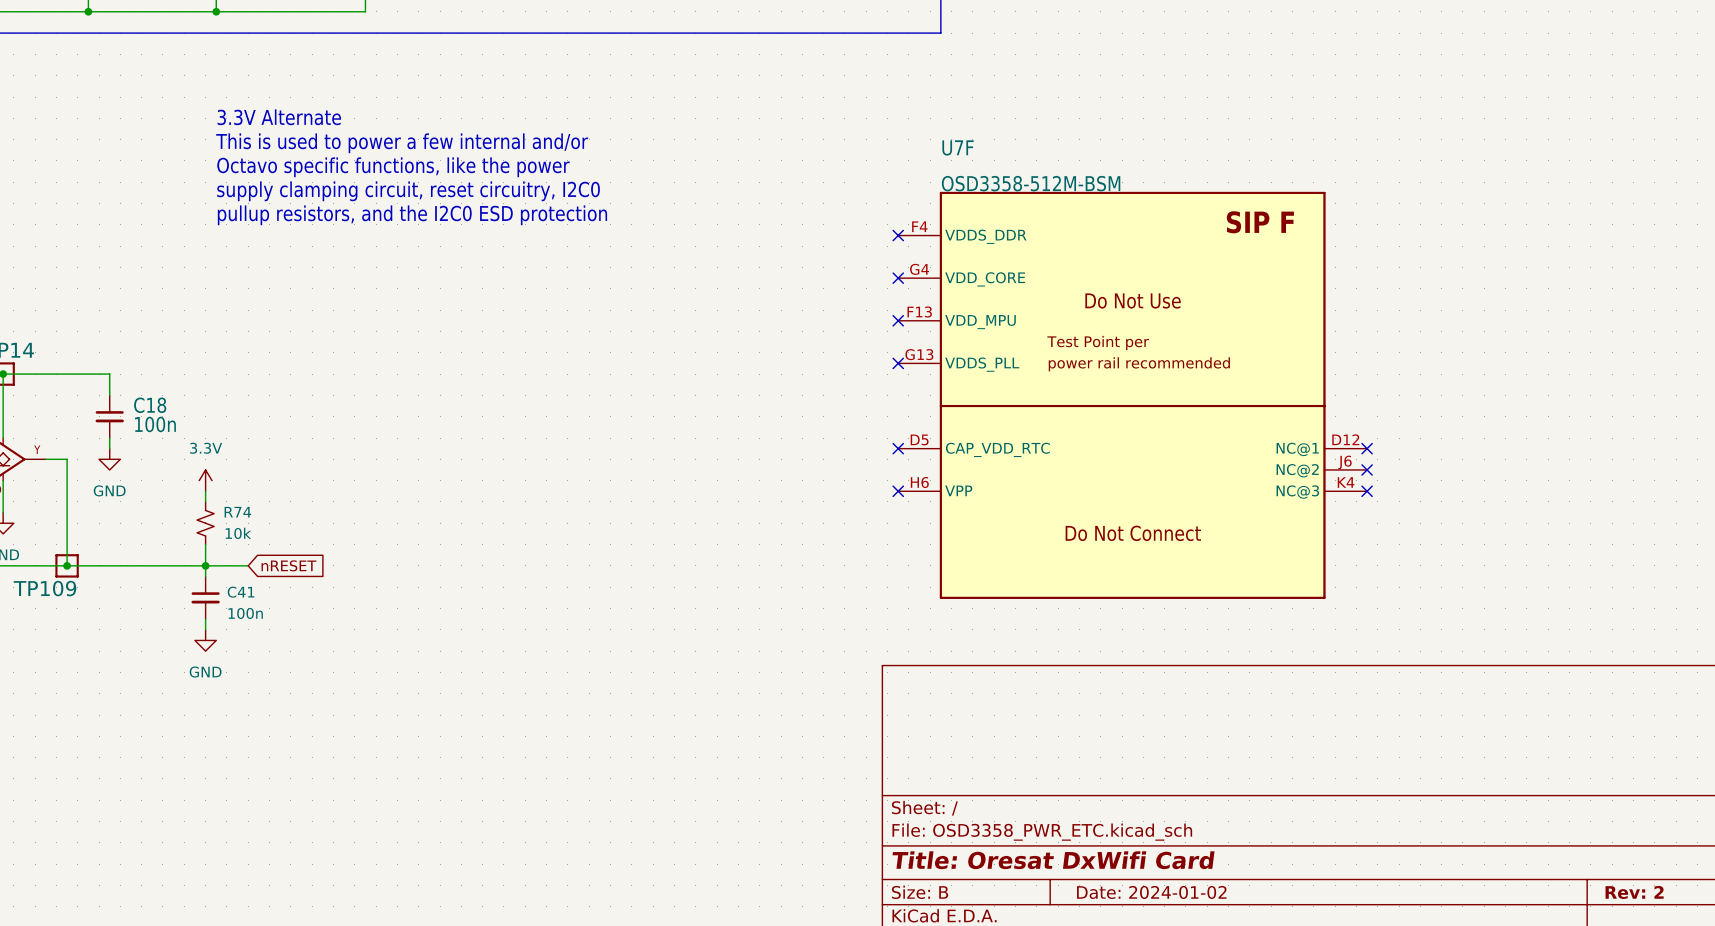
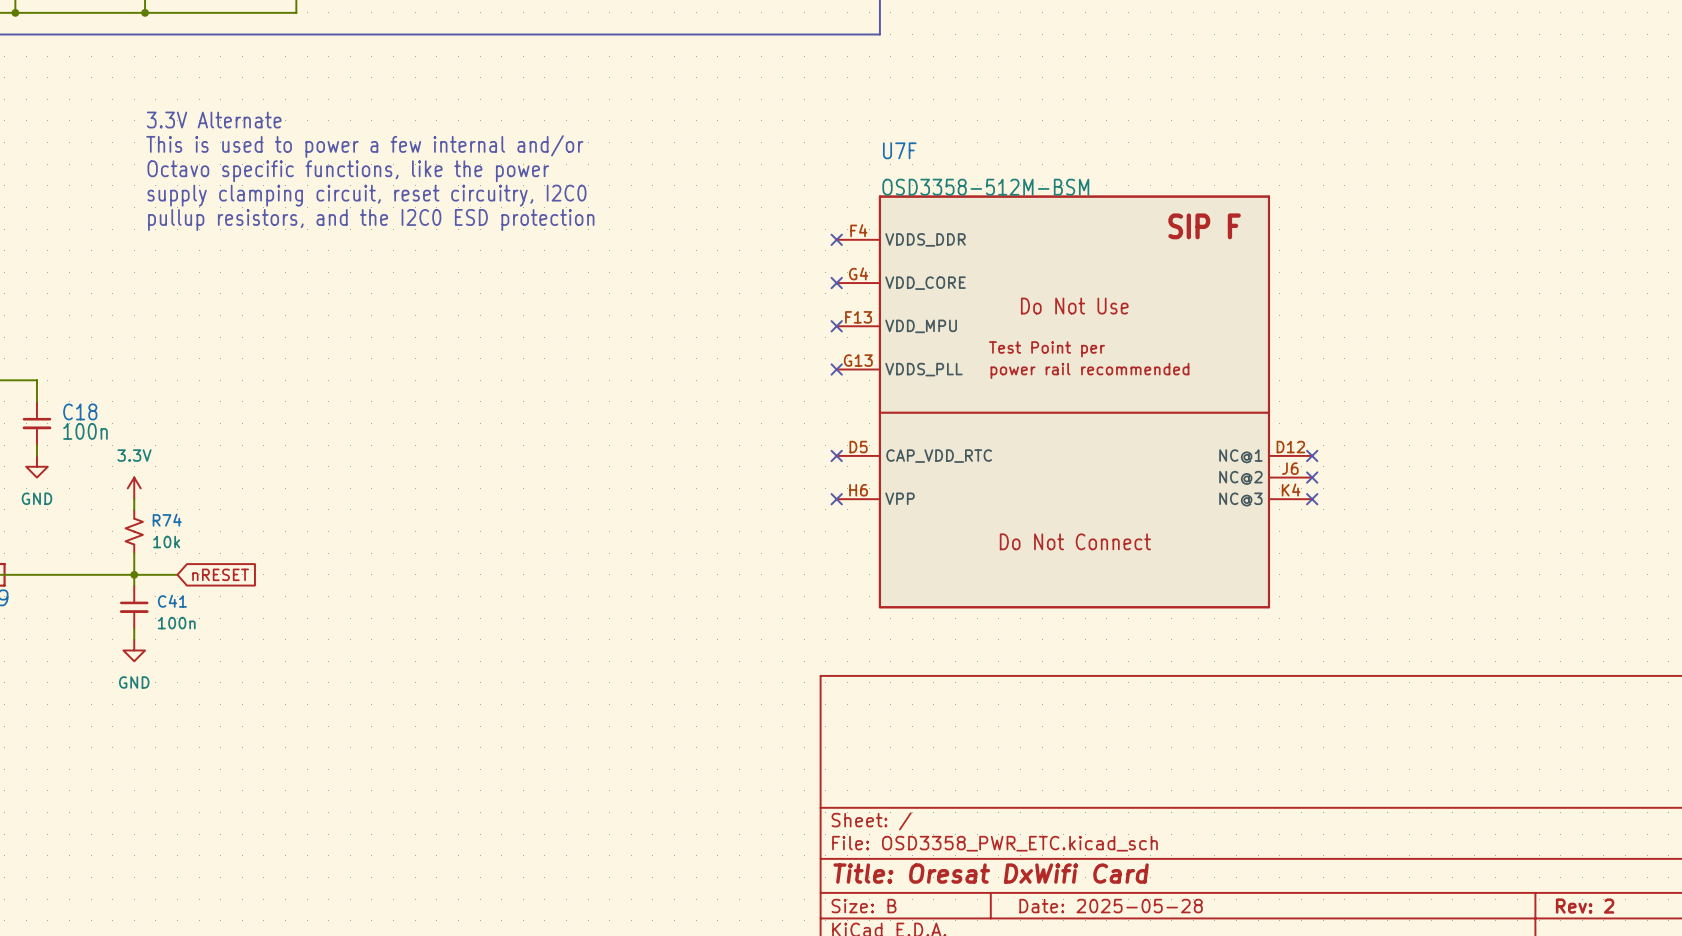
title block: Date: 2024-01-02 (1151, 892) -> Date: 2025-05-28 (1111, 906)

